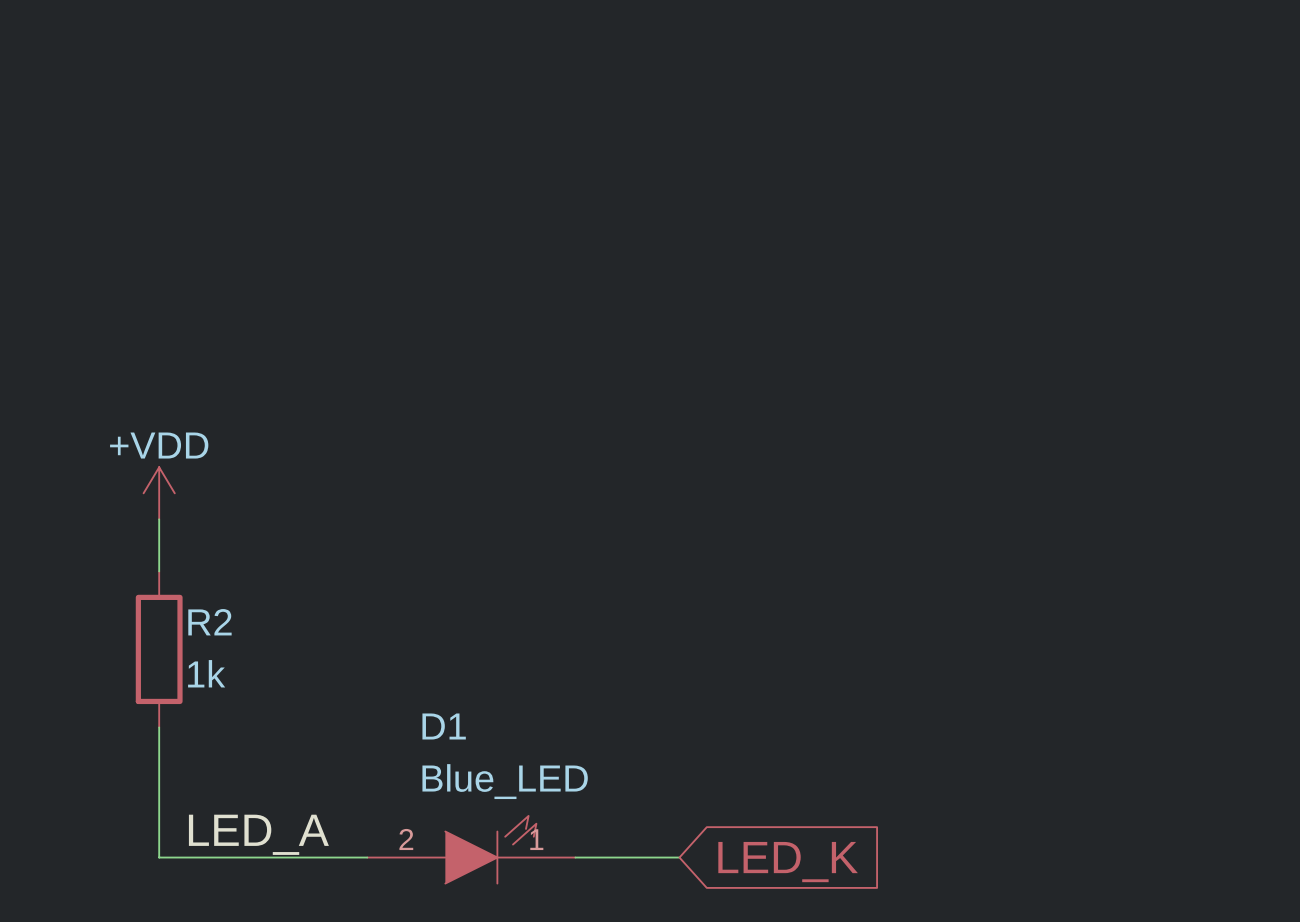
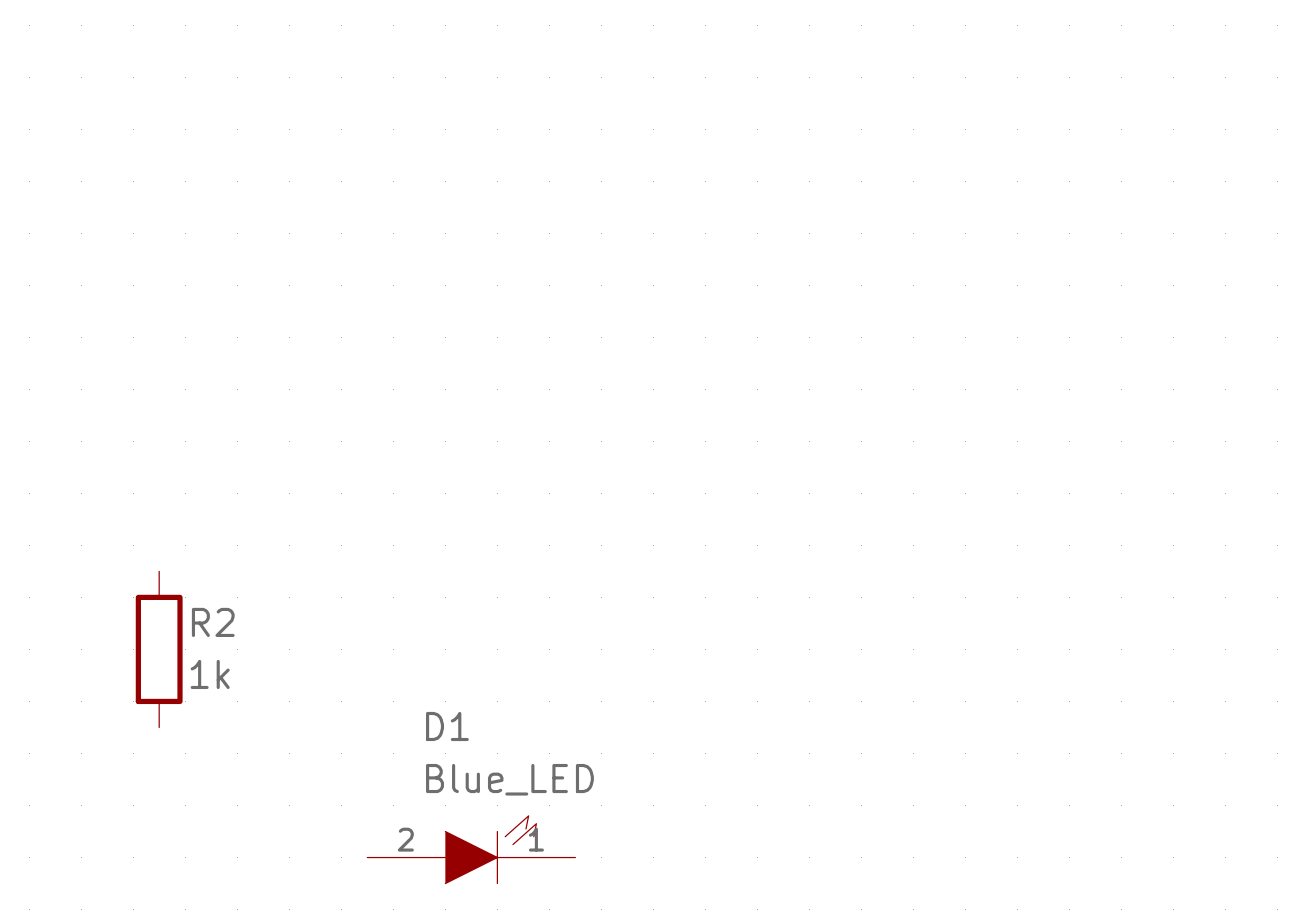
power symbol: +VDD (159, 493) -> none
wire: (159, 519) (159, 571) -> none
wire: (159, 727) (159, 857) (367, 857) -> none
label: LED_A (258, 834) -> none
wire: (575, 857) (679, 857) -> none
global label: LED_K (788, 862) -> none

